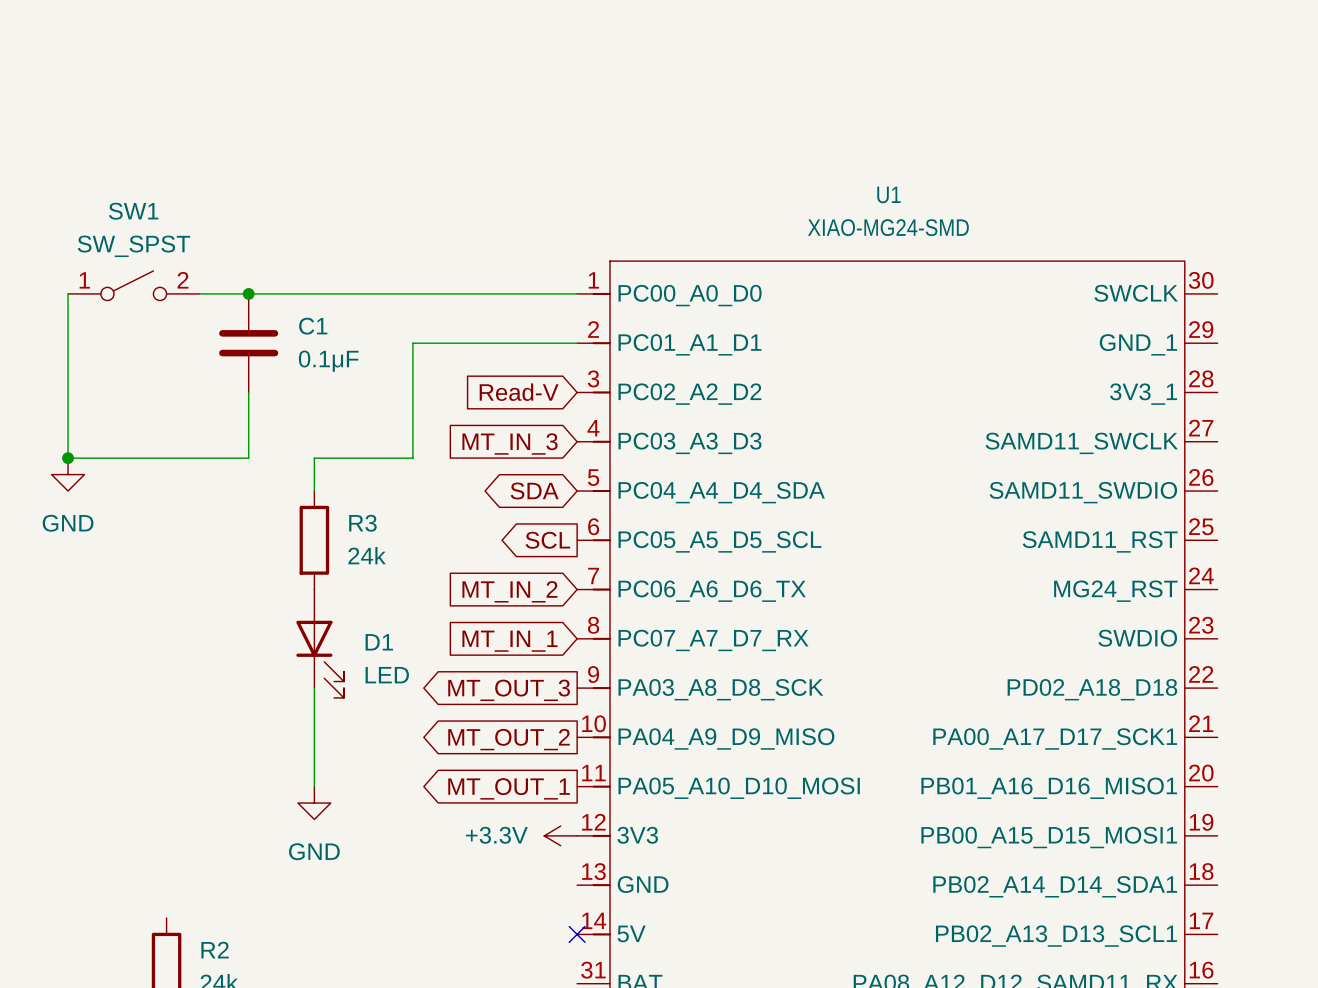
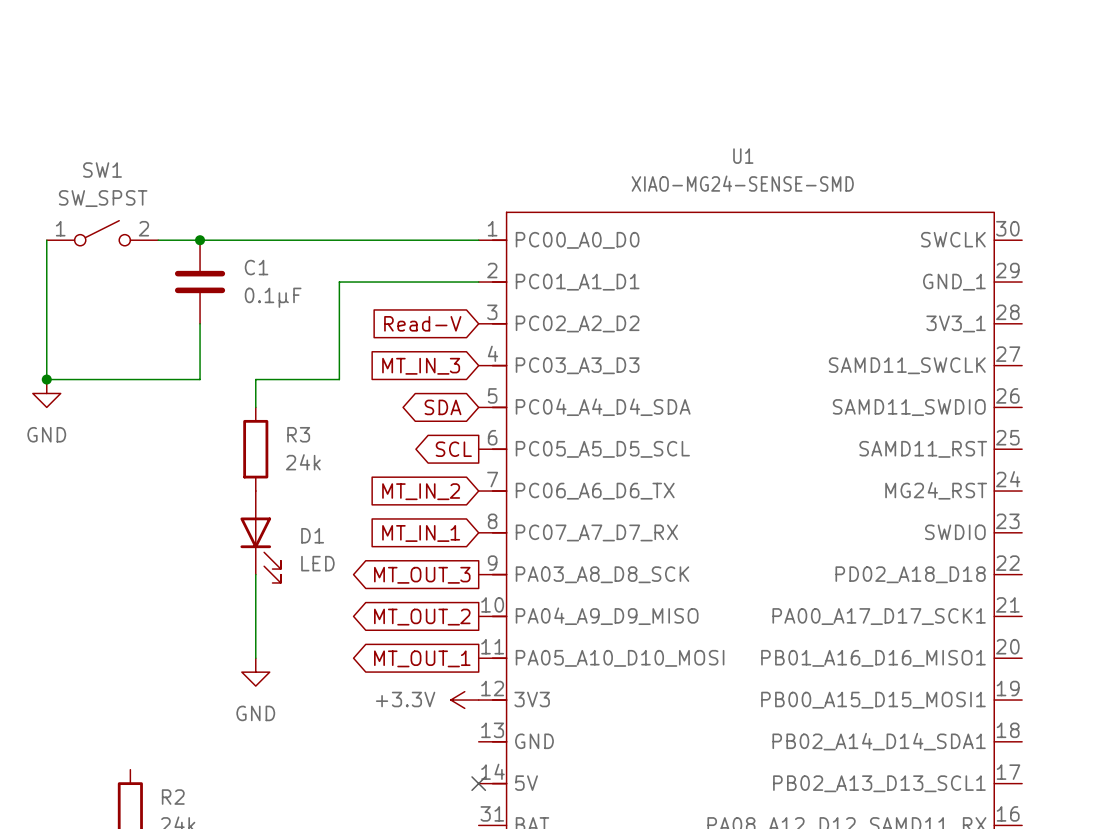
U1 value: XIAO-MG24-SMD (888, 227) -> XIAO-MG24-SENSE-SMD (742, 183)

